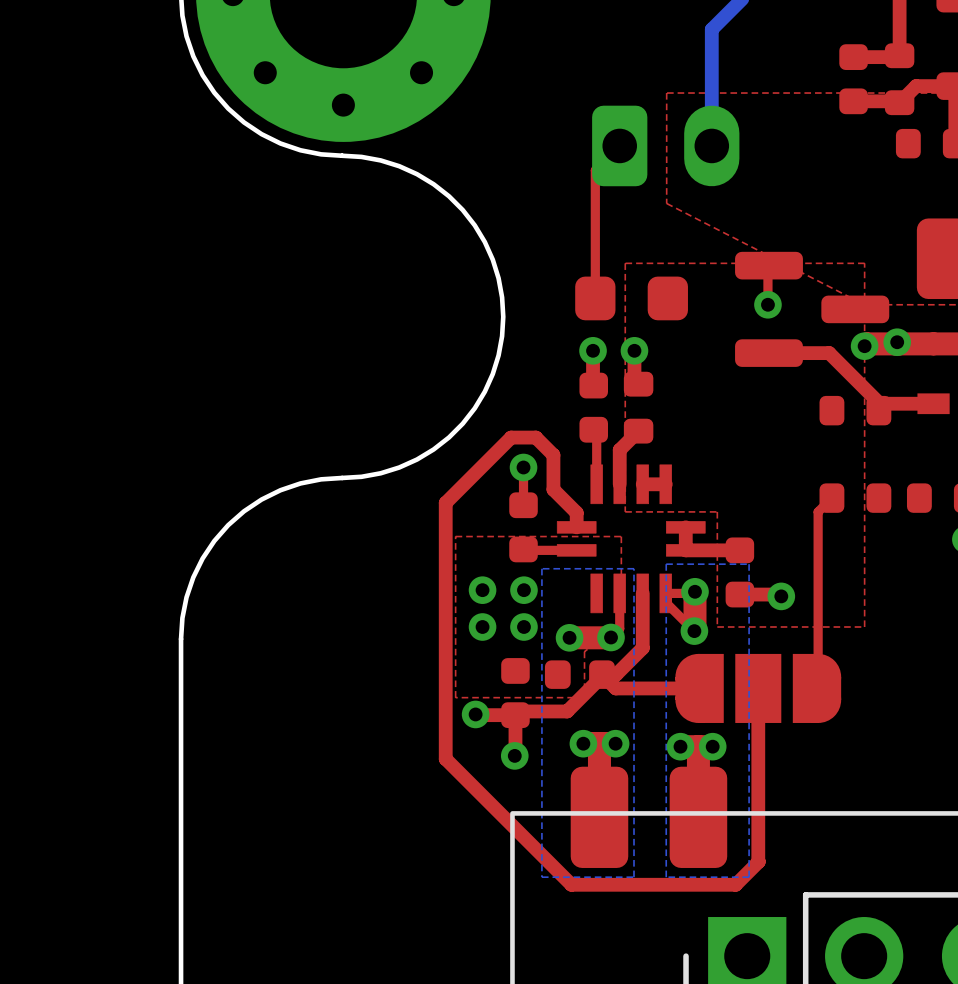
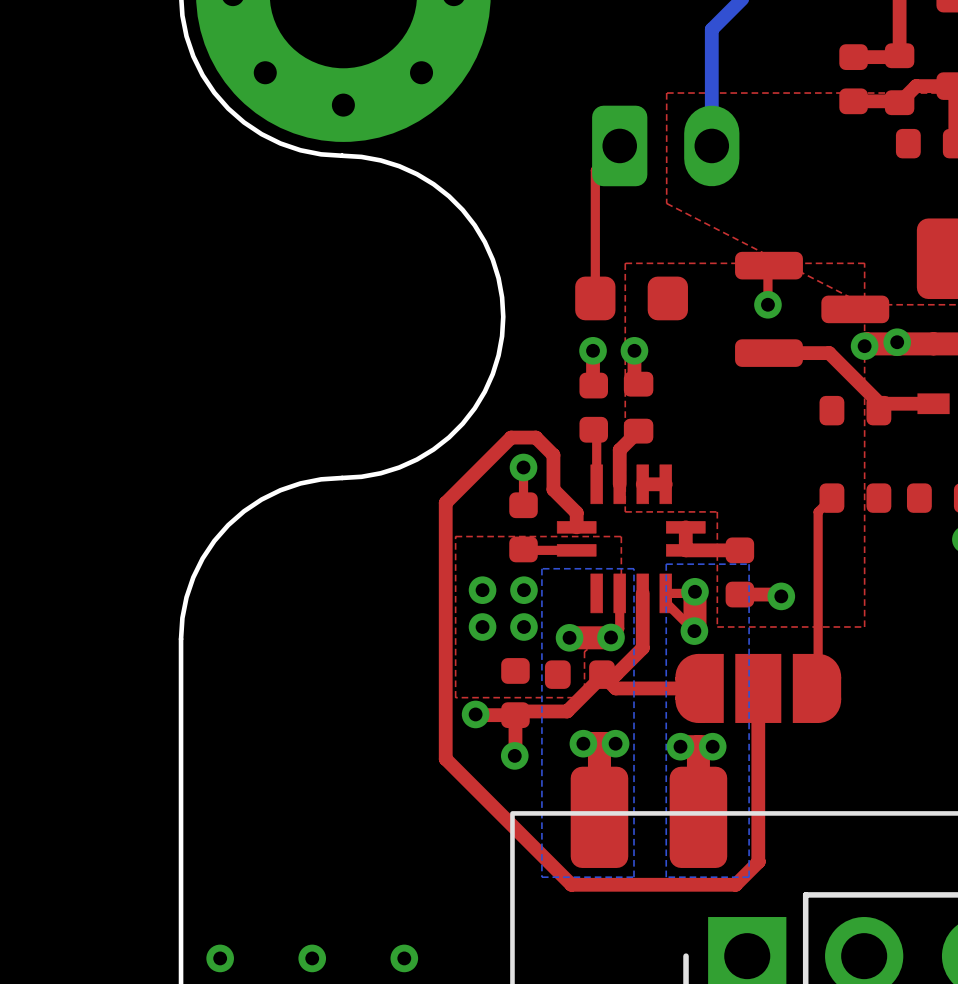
via: none -> (220, 958)
via: none -> (312, 958)
via: none -> (404, 958)

